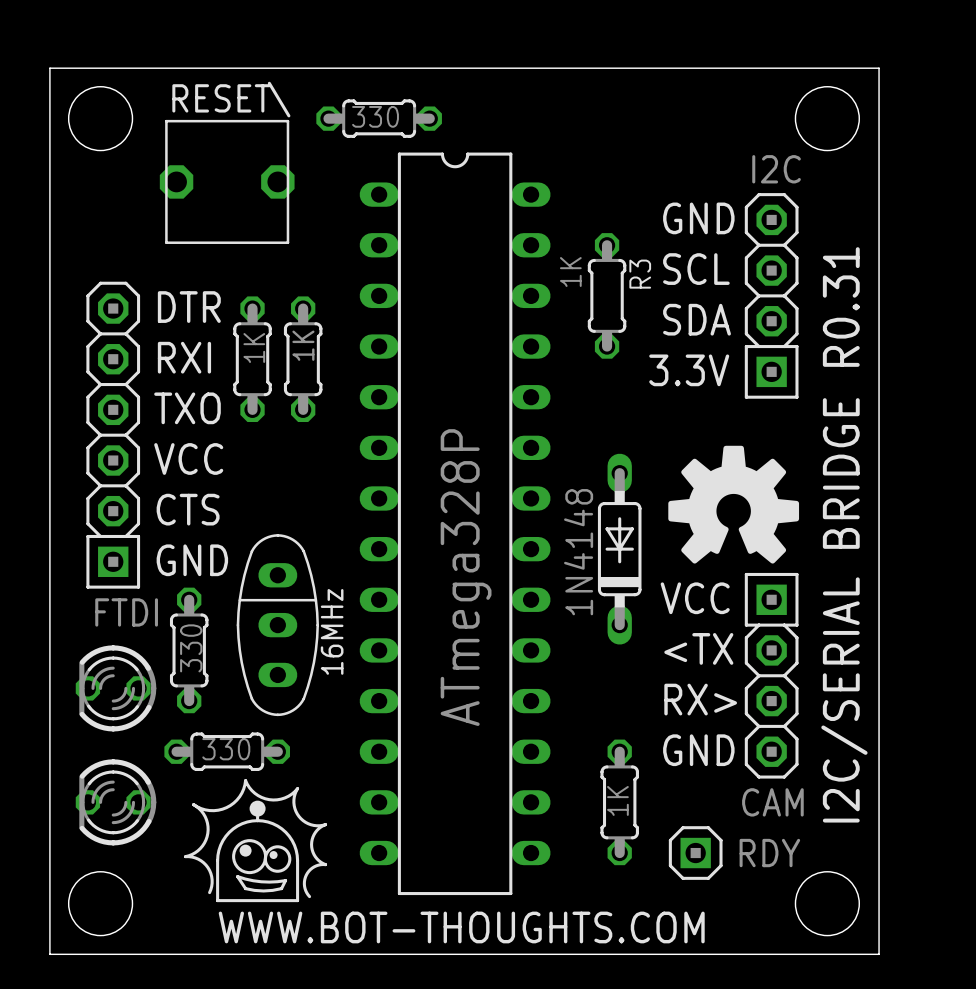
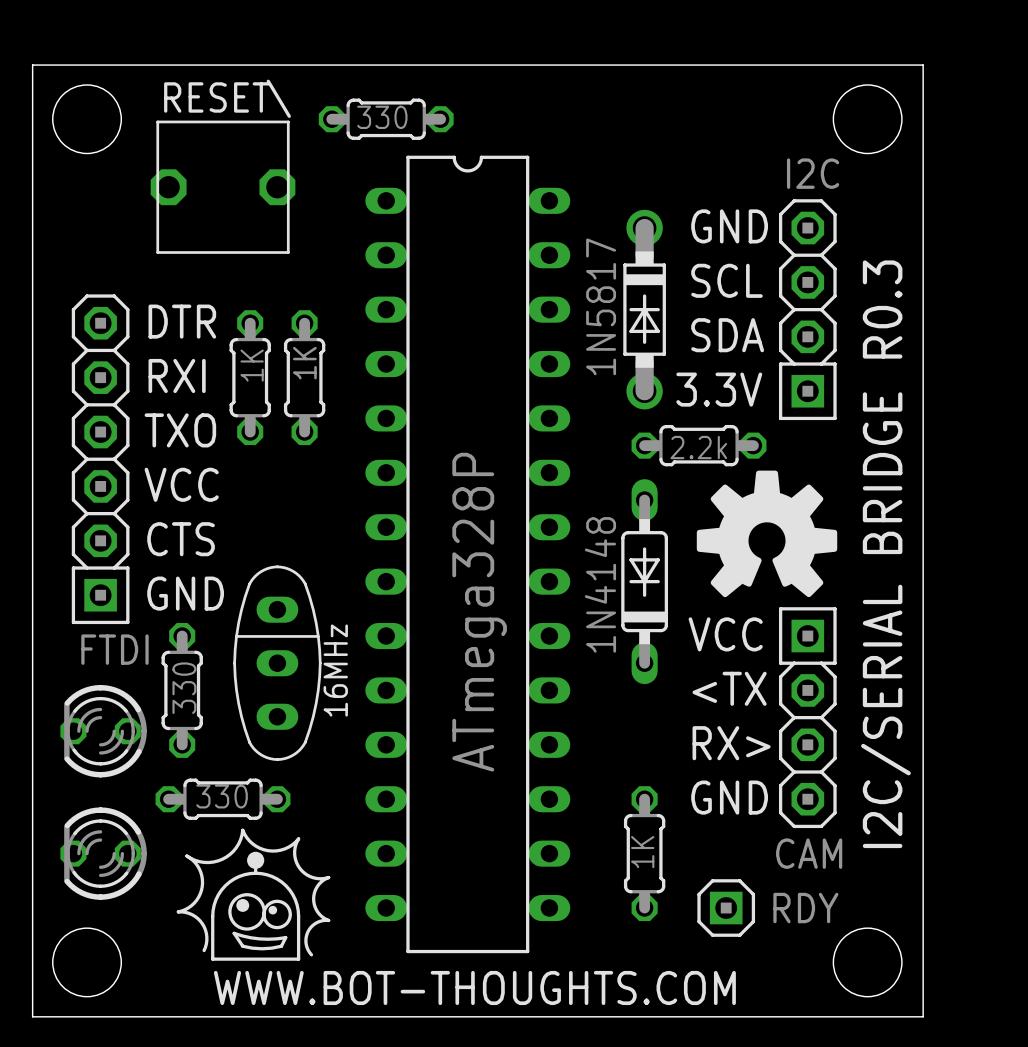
R3: 1K (607, 295) -> none
part: none -> 1N5817 (644, 309)
part: none -> 2.2k (699, 445)
text: I2C/SERIAL BRIDGE R0.31 (844, 534) -> I2C/SERIAL BRIDGE R0.3 (885, 554)

